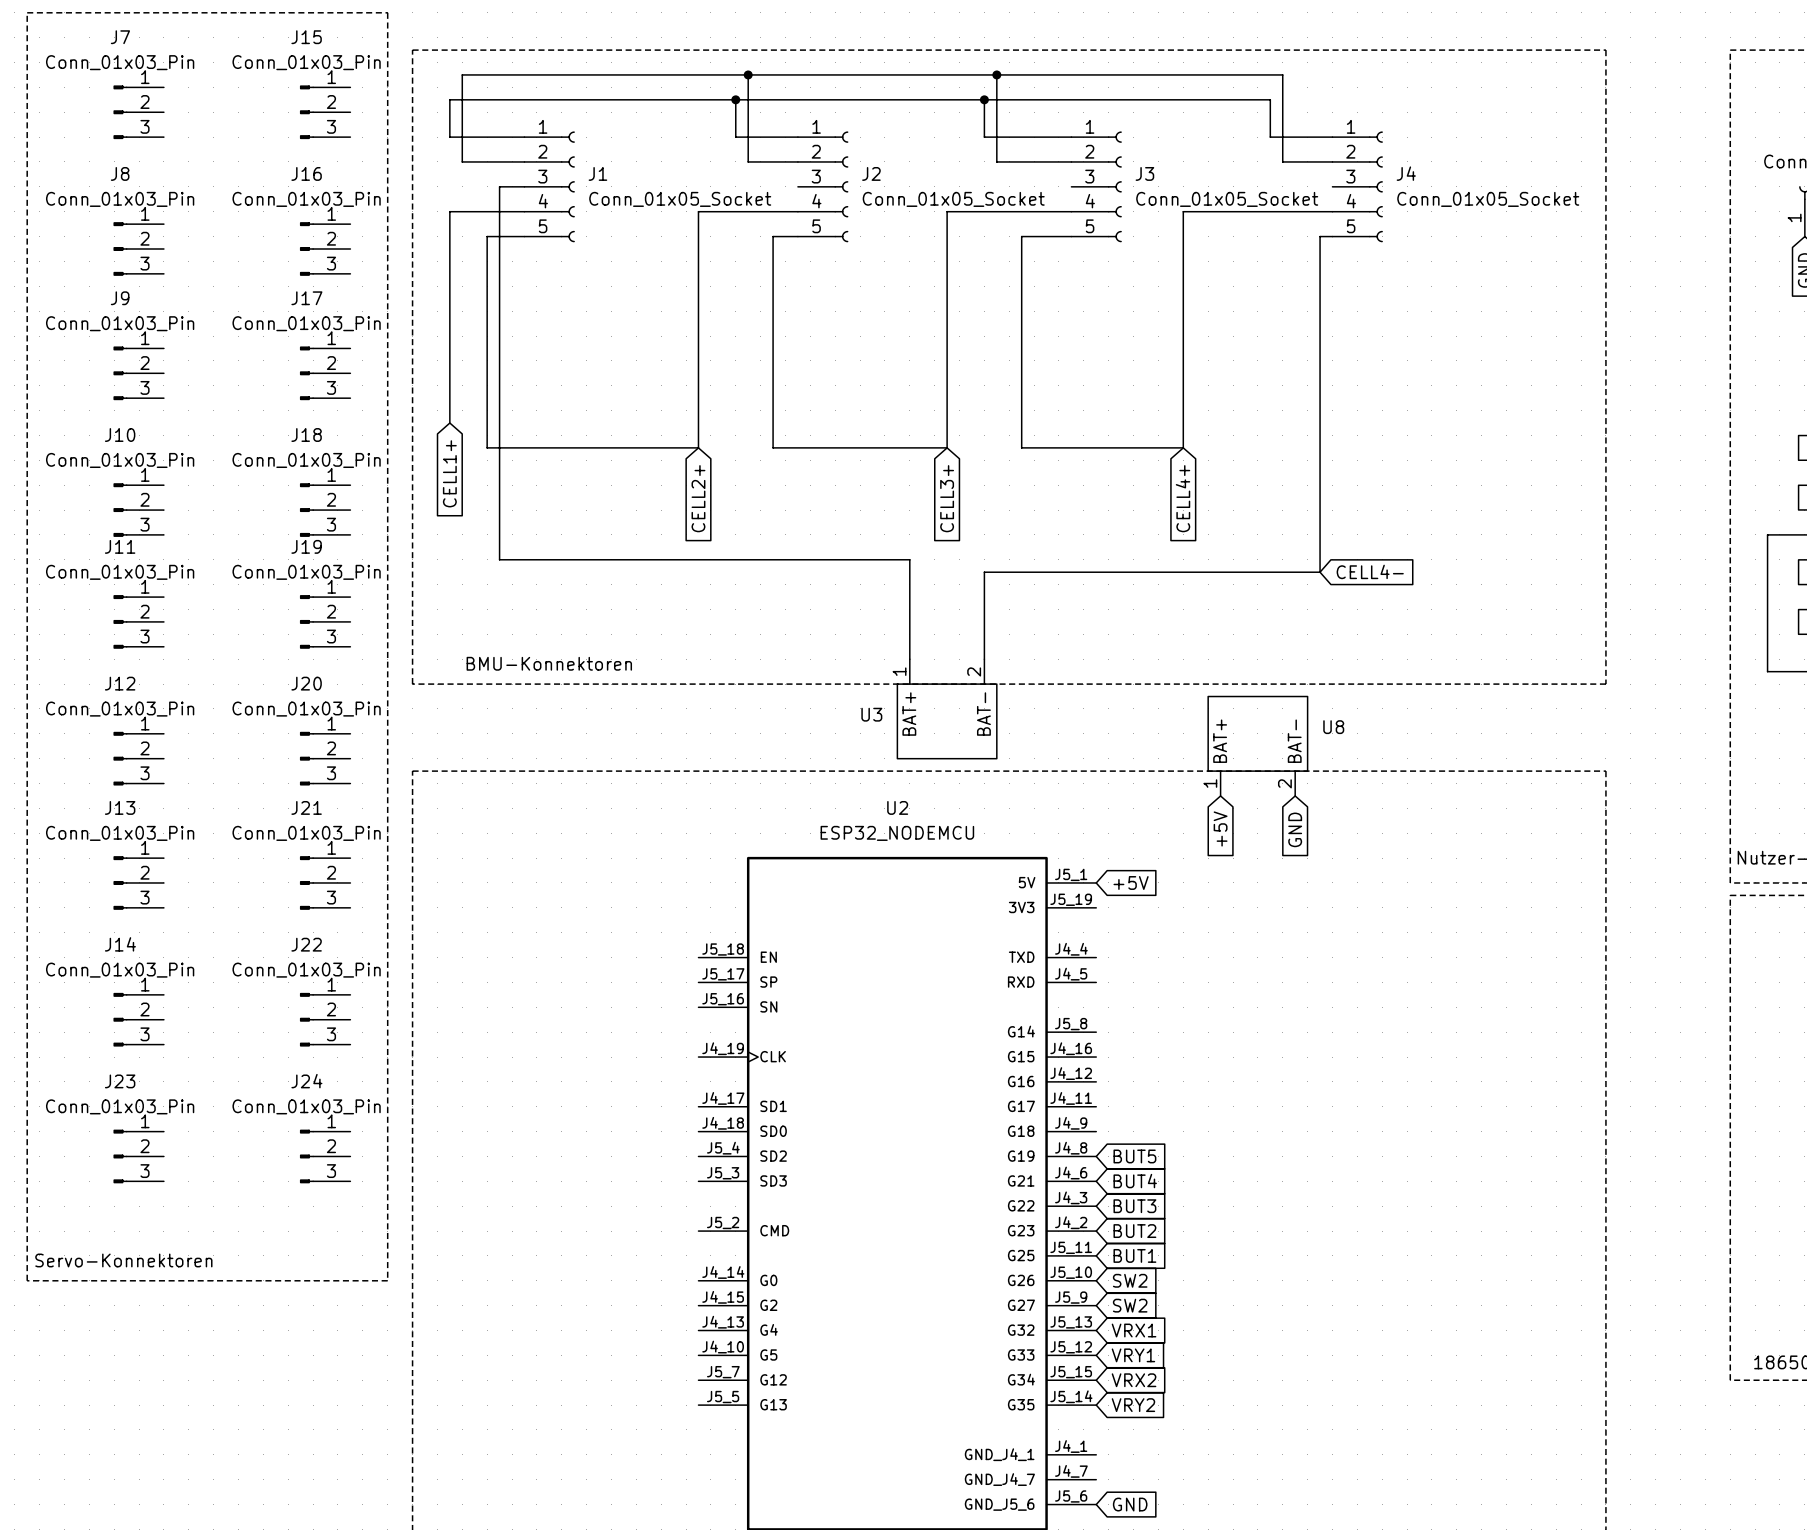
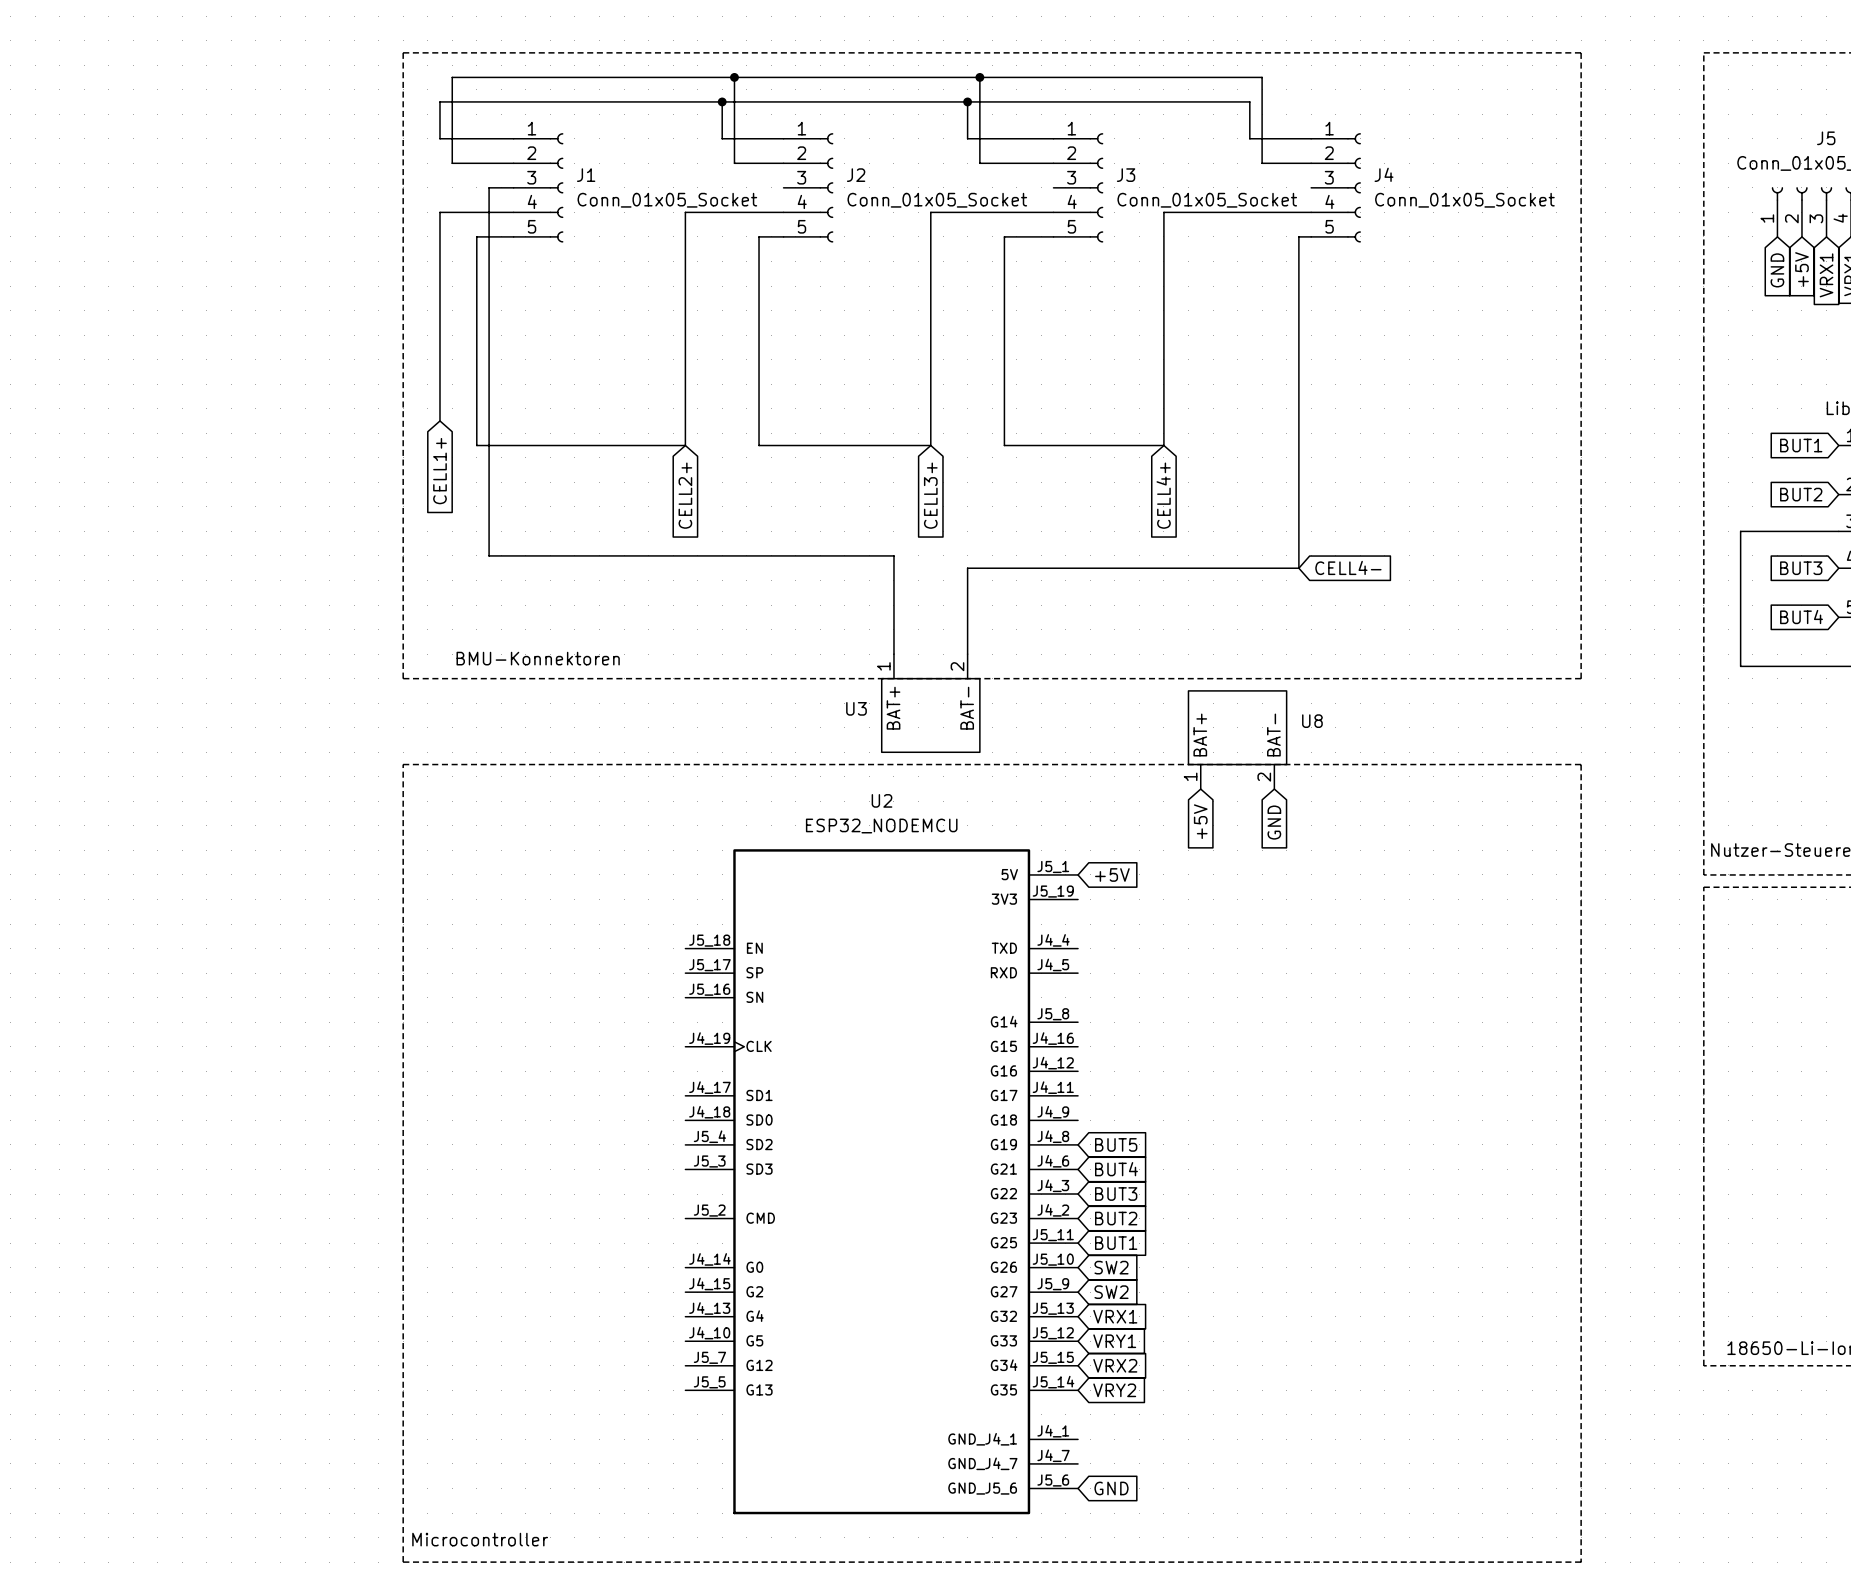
line: (27, 12) (387, 12) (387, 1280) (27, 1280) (27, 12) -> none
J7: Conn_01x03_Pin (138, 112) -> none
J15: Conn_01x03_Pin (325, 112) -> none
J8: Conn_01x03_Pin (138, 249) -> none
J16: Conn_01x03_Pin (325, 249) -> none
J9: Conn_01x03_Pin (138, 373) -> none
J17: Conn_01x03_Pin (325, 373) -> none
J10: Conn_01x03_Pin (138, 510) -> none
J18: Conn_01x03_Pin (325, 510) -> none
J11: Conn_01x03_Pin (138, 621) -> none
J19: Conn_01x03_Pin (325, 621) -> none
J12: Conn_01x03_Pin (138, 758) -> none
J20: Conn_01x03_Pin (325, 758) -> none
J13: Conn_01x03_Pin (138, 882) -> none
J21: Conn_01x03_Pin (325, 882) -> none
J14: Conn_01x03_Pin (138, 1019) -> none
J22: Conn_01x03_Pin (325, 1019) -> none
J23: Conn_01x03_Pin (138, 1156) -> none
J24: Conn_01x03_Pin (325, 1156) -> none
text: Servo-Konnektoren (123, 1260) -> none

